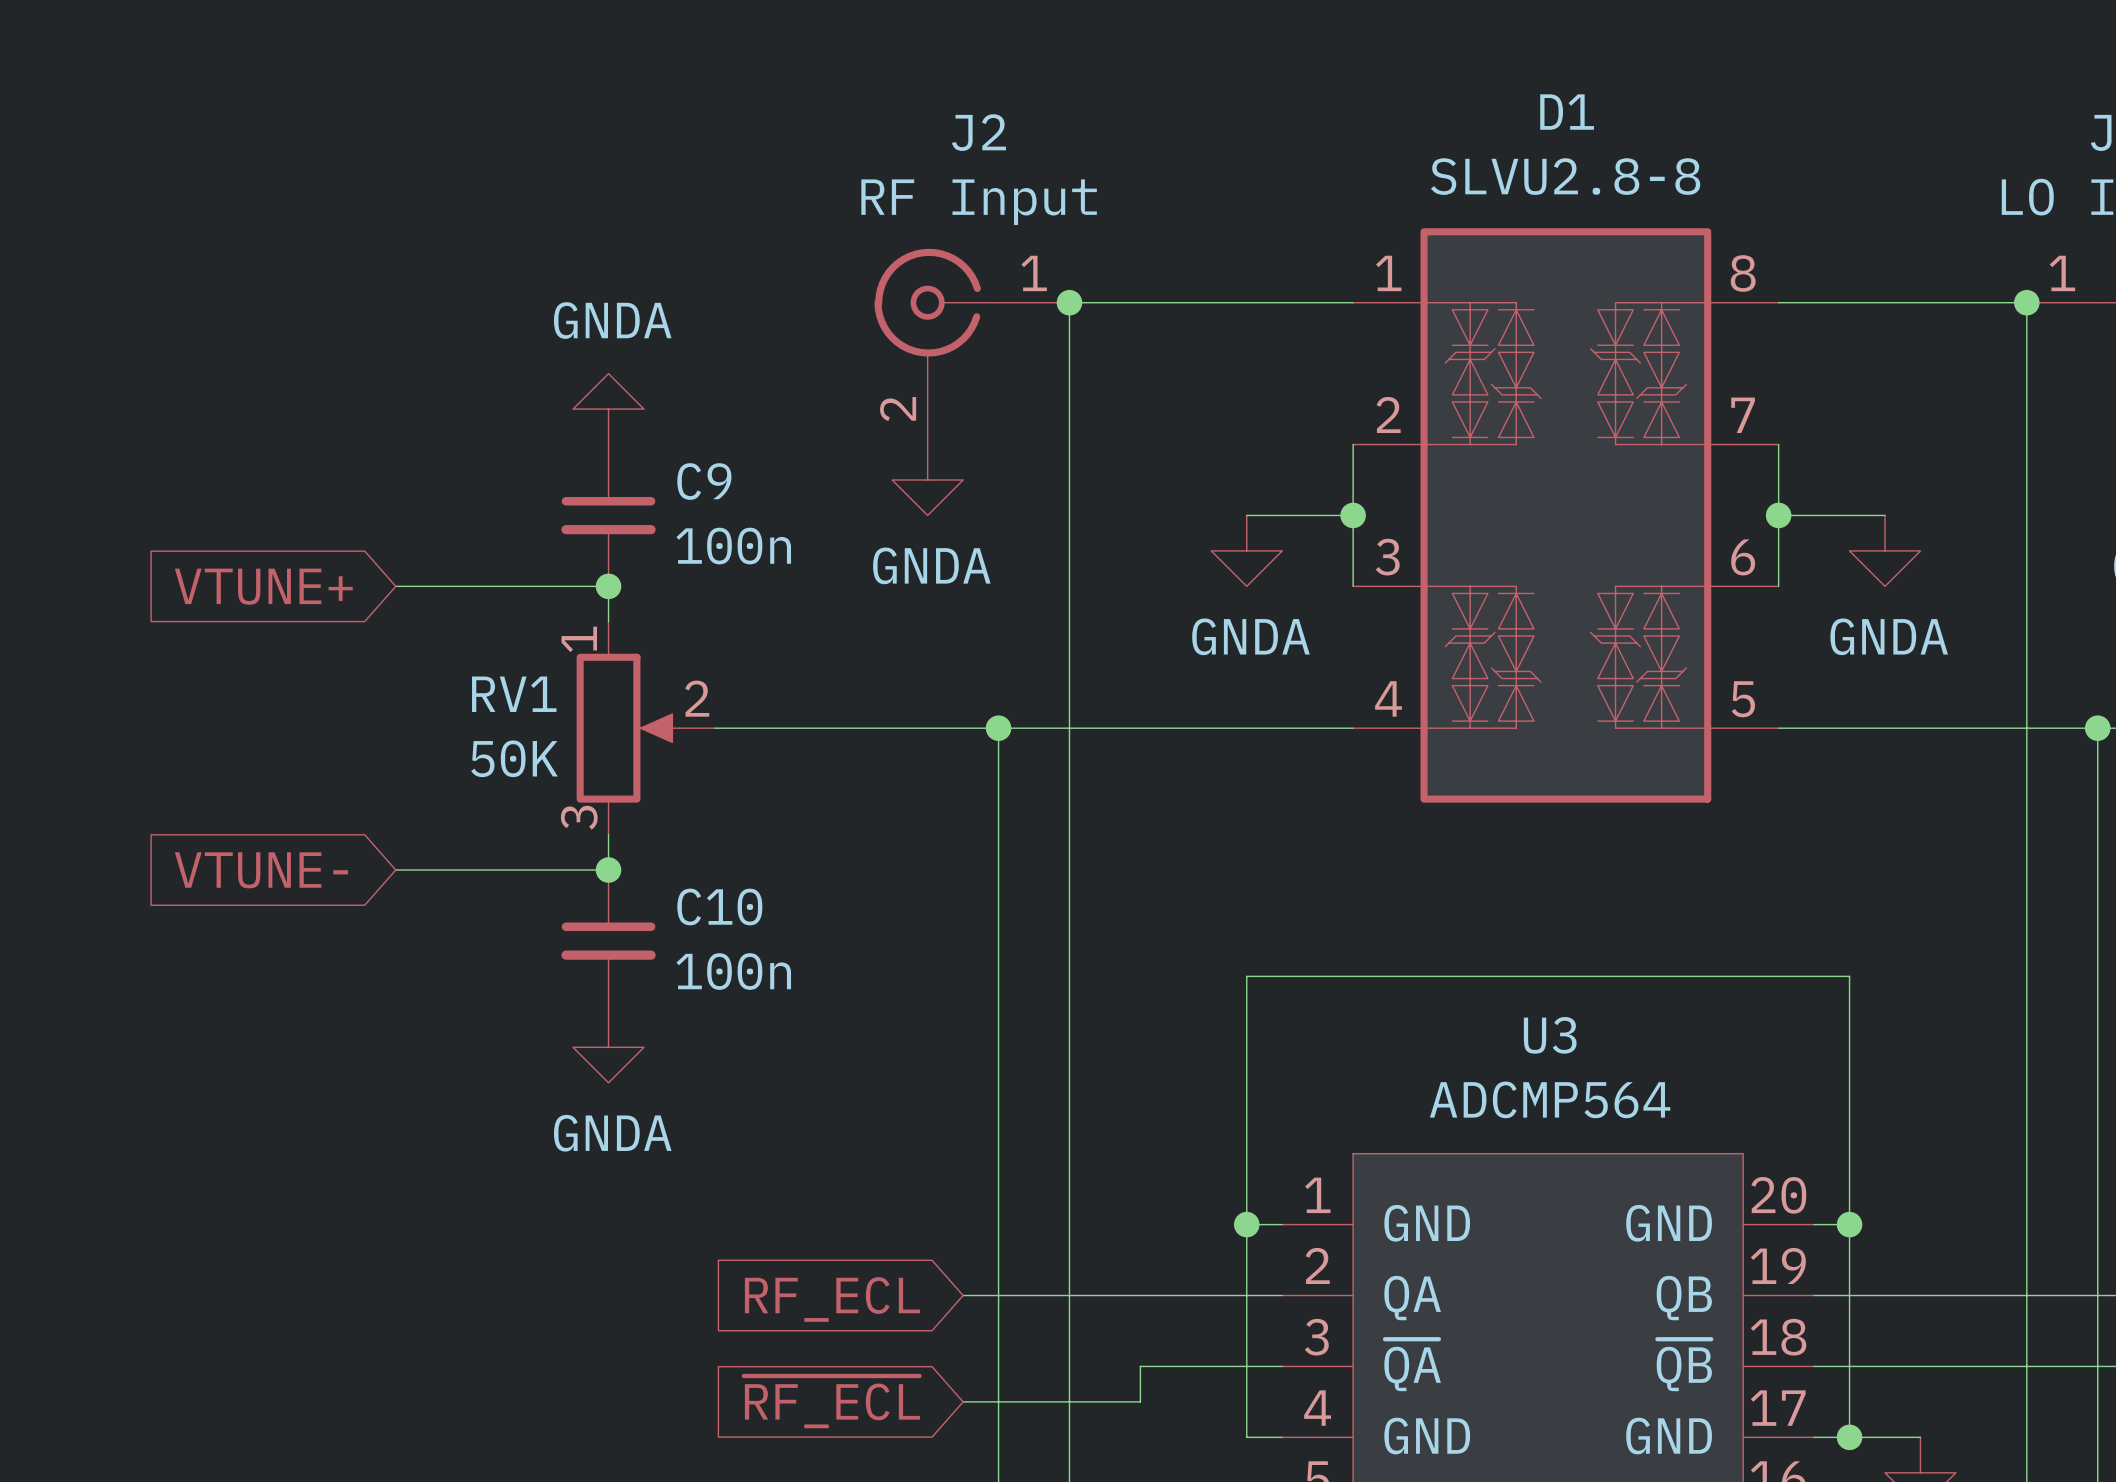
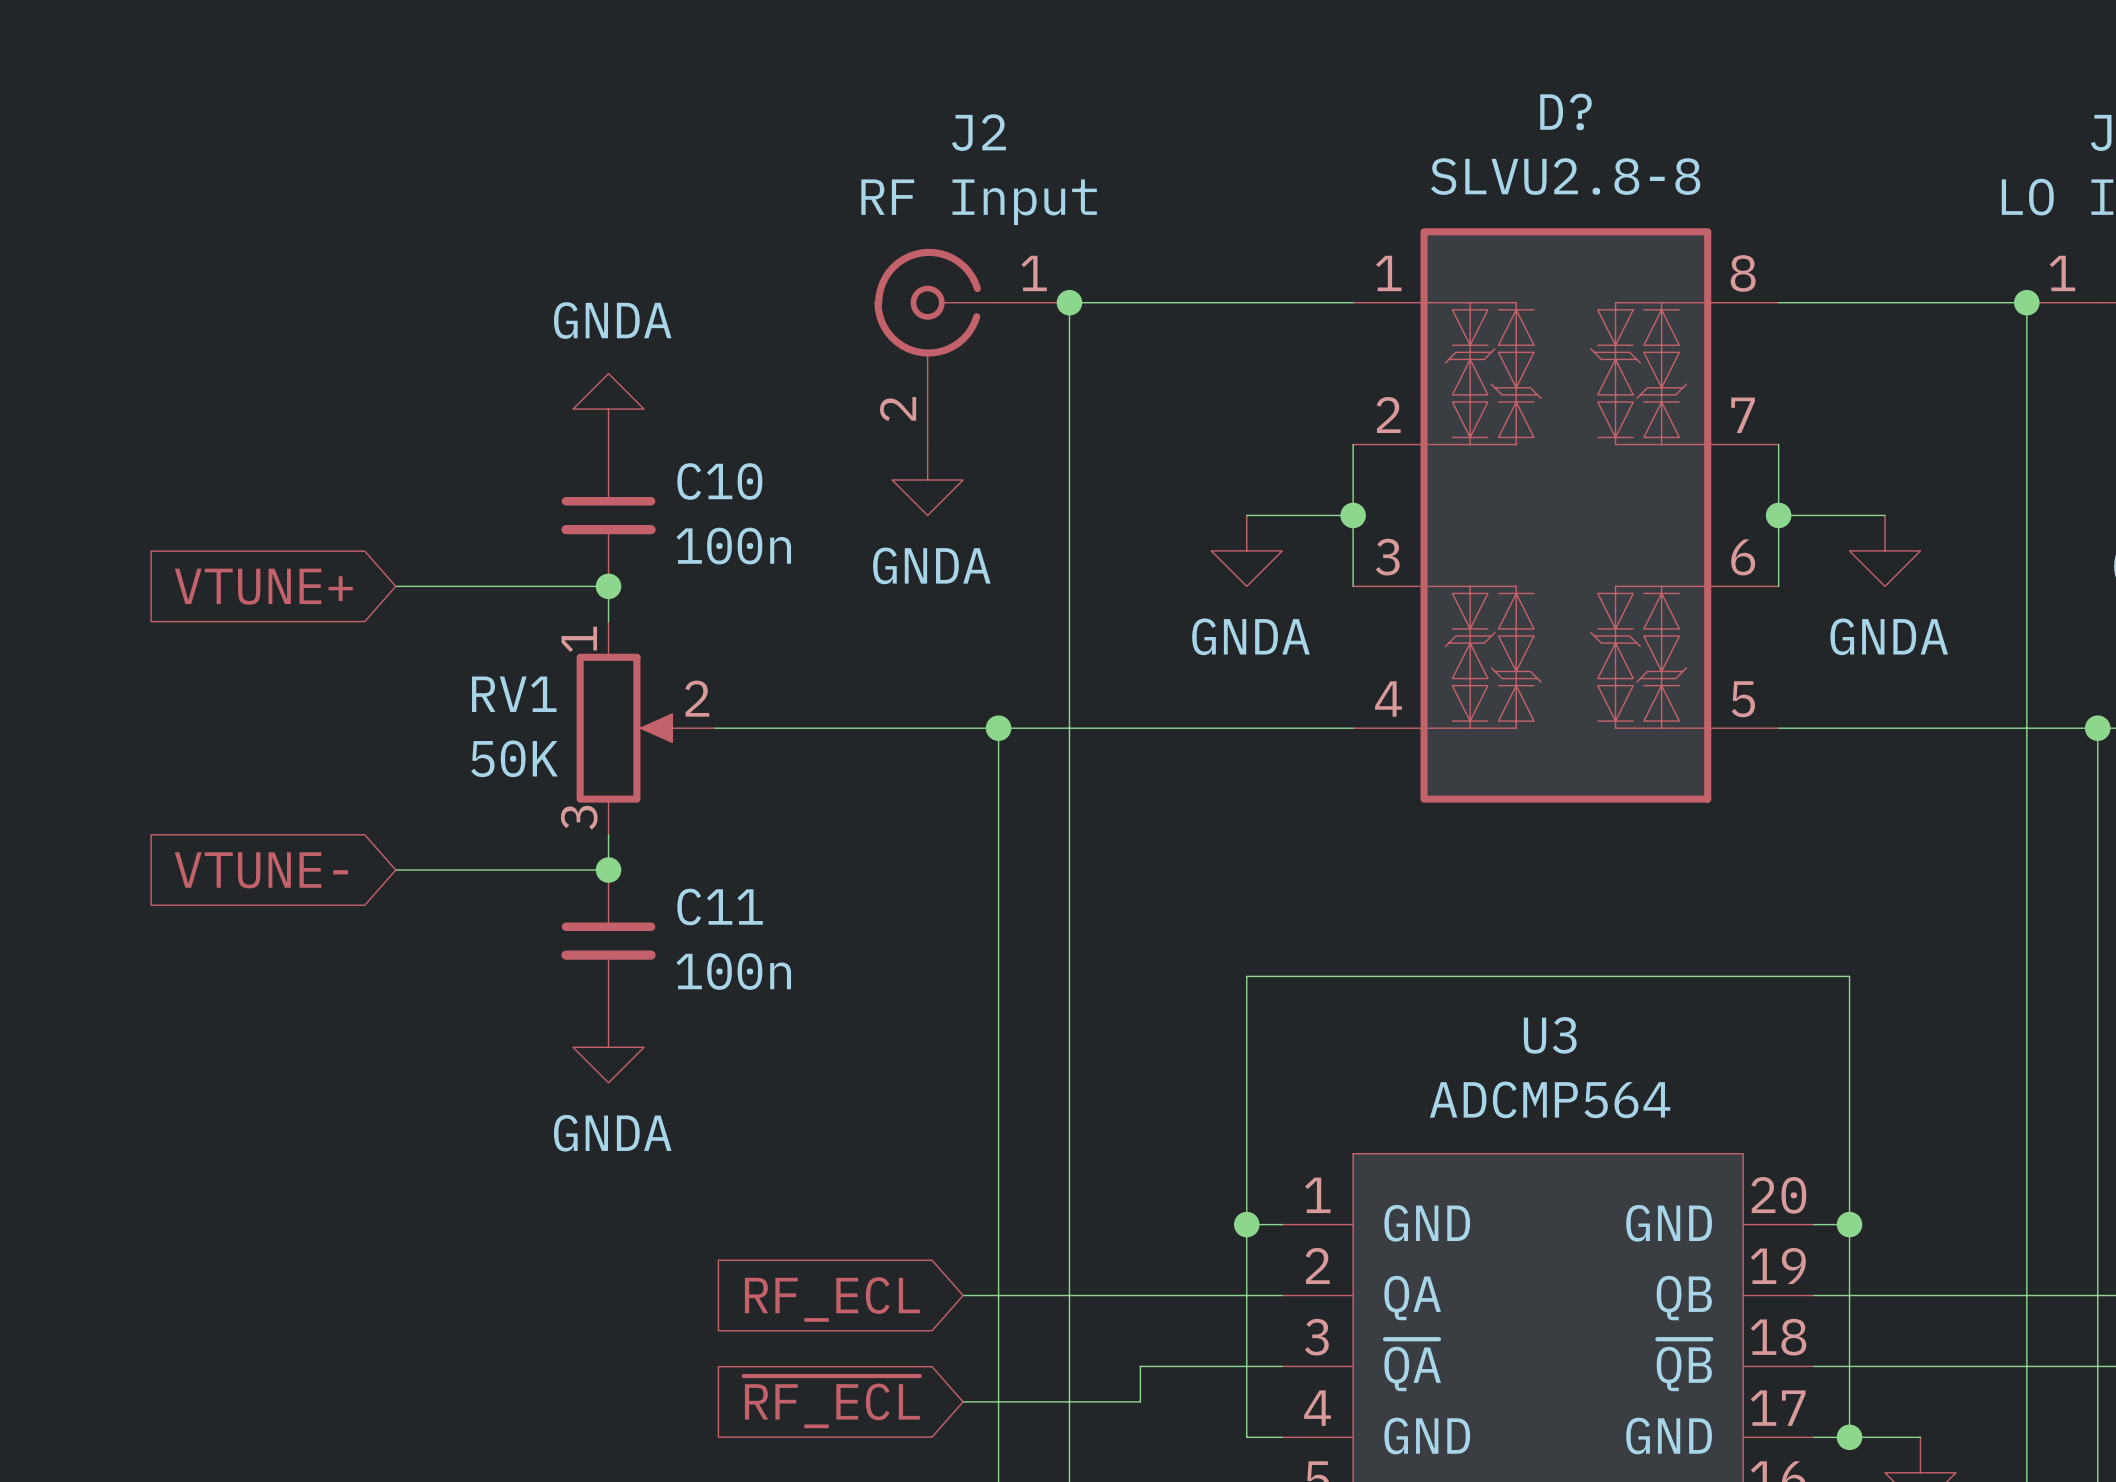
D1 name: D1 (1567, 112) -> D? (1566, 111)
C9 name: C9 (704, 481) -> C10 (719, 481)
C10 name: C10 (719, 906) -> C11 (720, 906)

